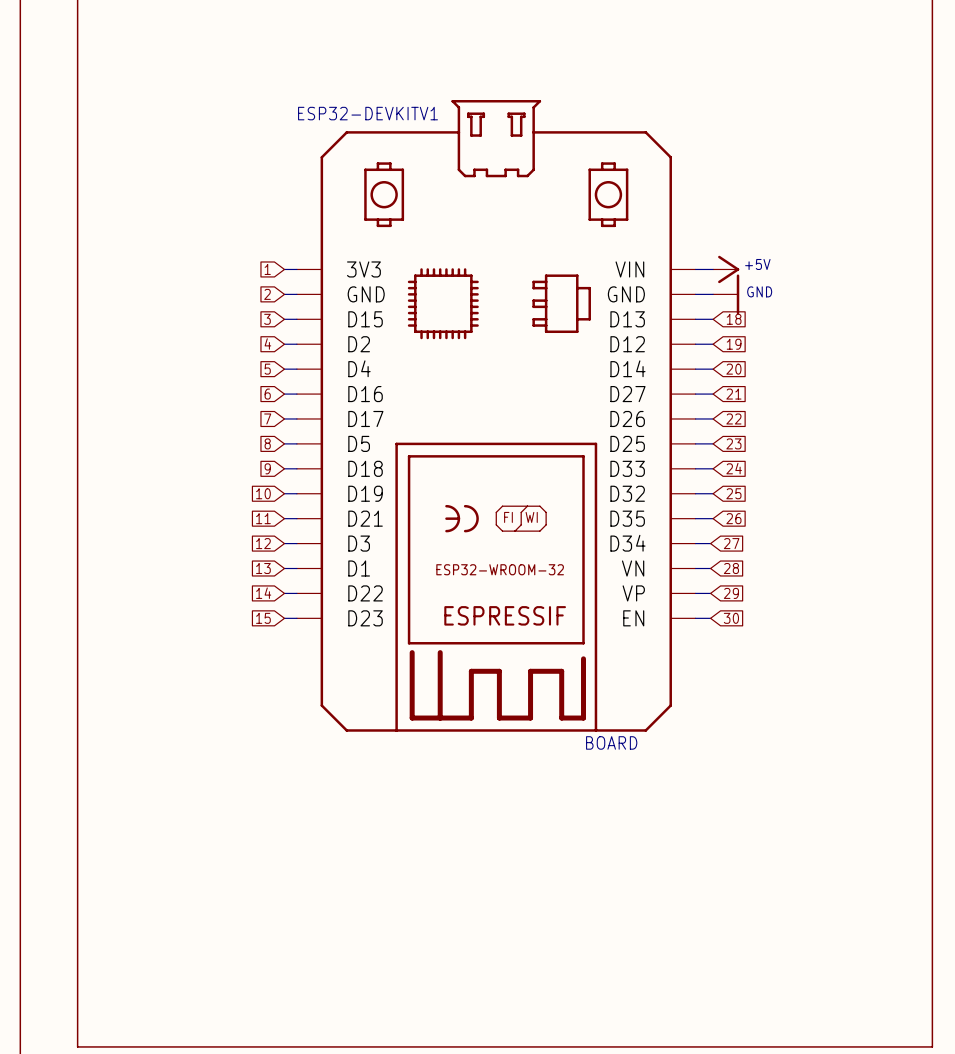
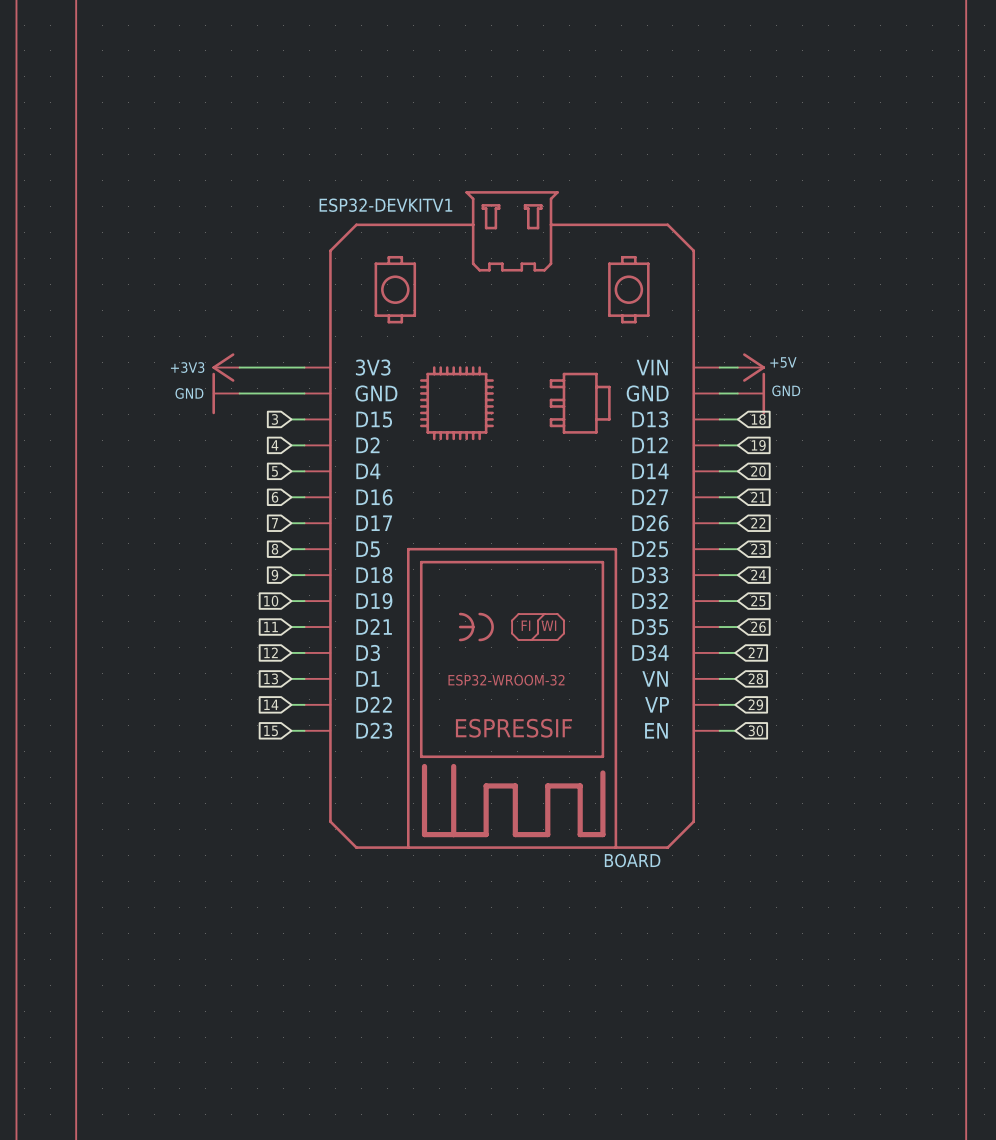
power symbol: none -> +3V3 (226, 367)
wire: none -> (239, 367) (291, 367)
global label: 1 (267, 269) -> none
power symbol: none -> GND (226, 393)
wire: none -> (239, 393) (291, 393)
global label: 2 (267, 294) -> none

